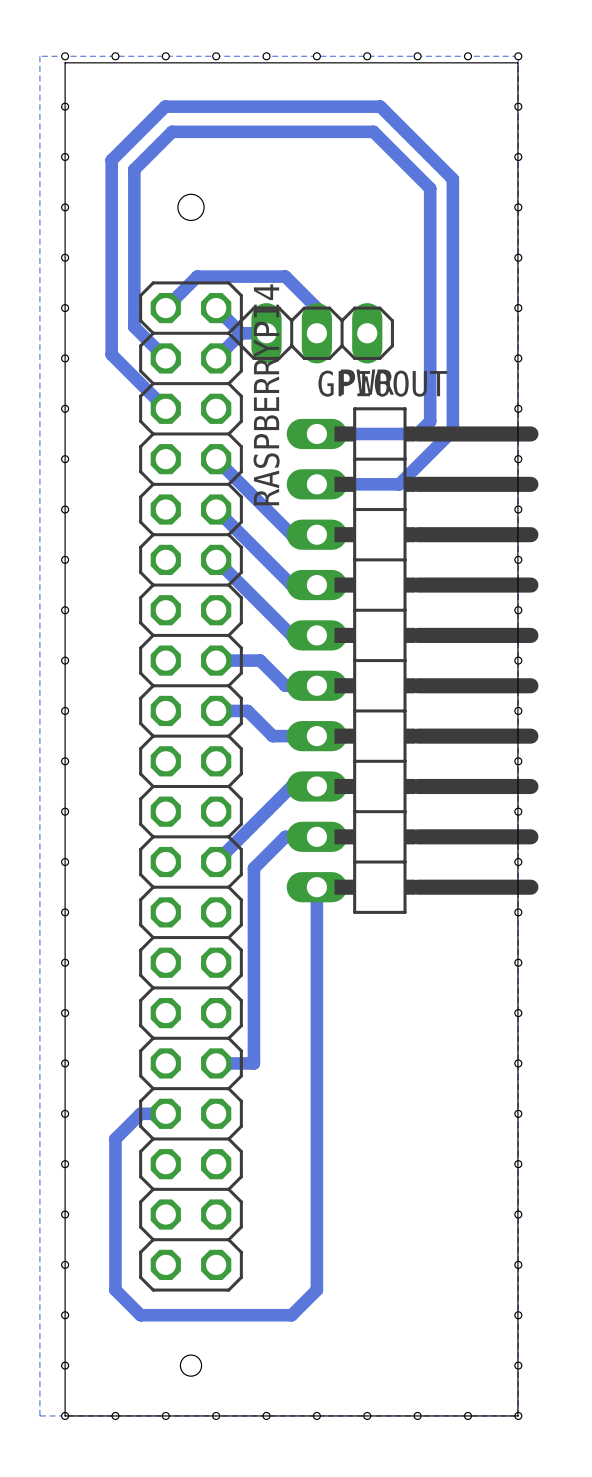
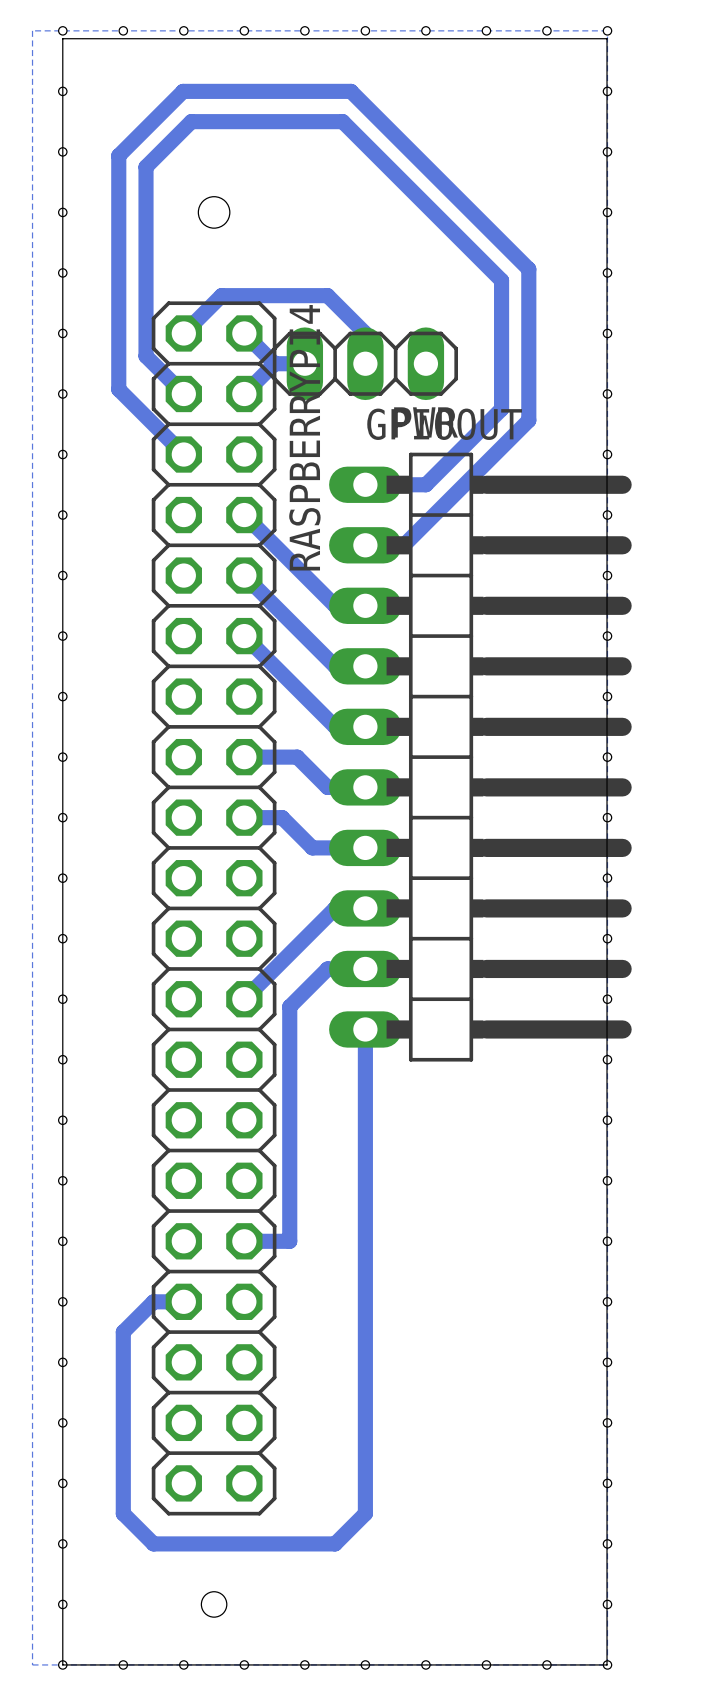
bottom track: (304, 106) (380, 106) (452, 179) (452, 254) -> (350, 91) (528, 269)
bottom track: (298, 131) (373, 131) (430, 188) (430, 264) -> (342, 121) (501, 280)
bottom track: (430, 371) (430, 421) (417, 433) (367, 433) -> (501, 409) (425, 484)
bottom track: (452, 380) (452, 430) (399, 484) (348, 484) -> (528, 420) (403, 545)

